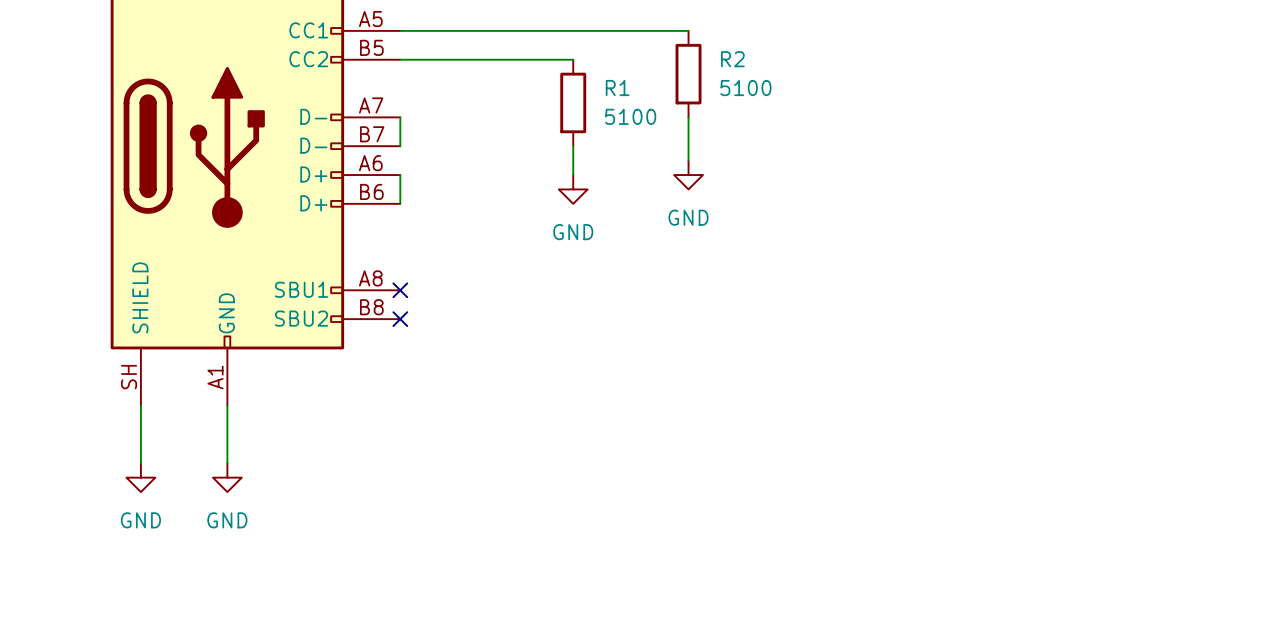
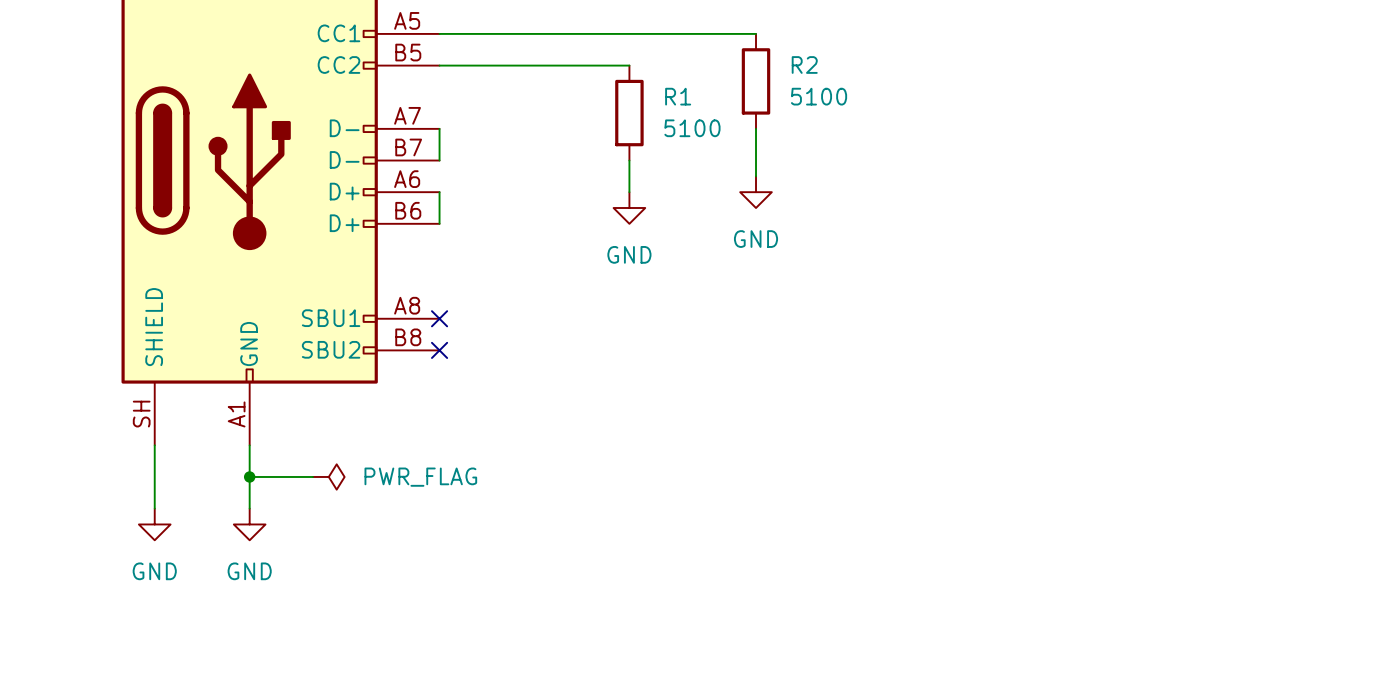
wire: none -> (249, 476) (312, 476)
junction: none -> (249, 476)
power symbol: none -> PWR_FLAG (328, 476)

